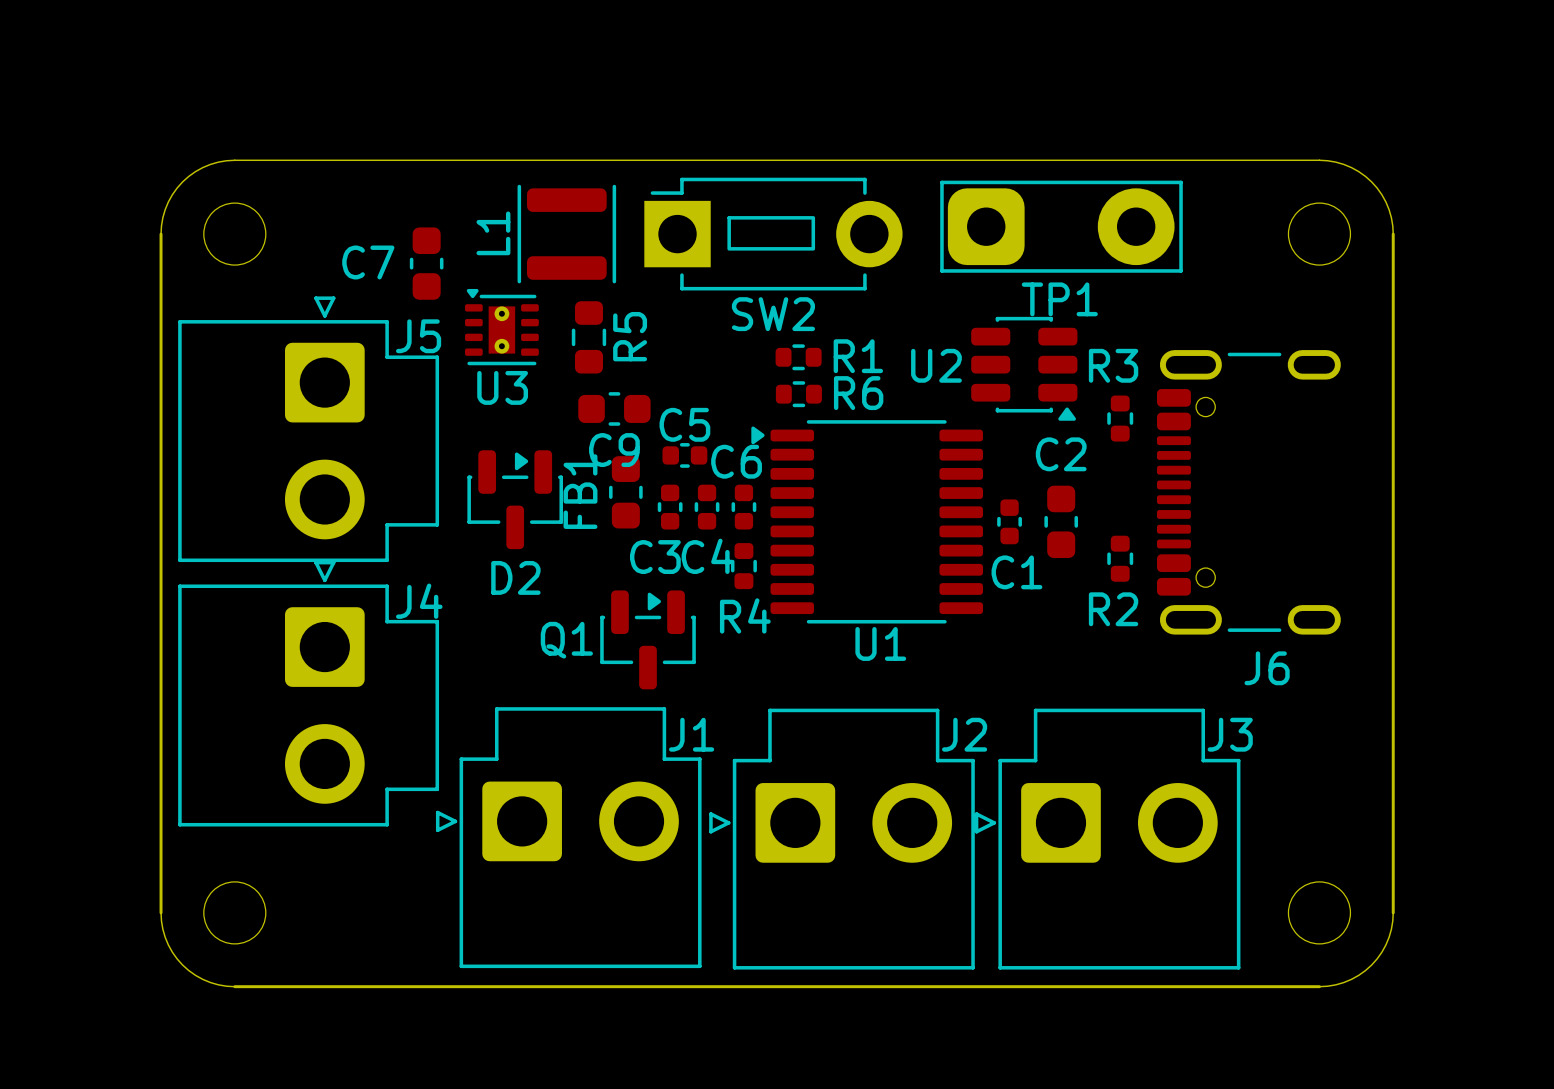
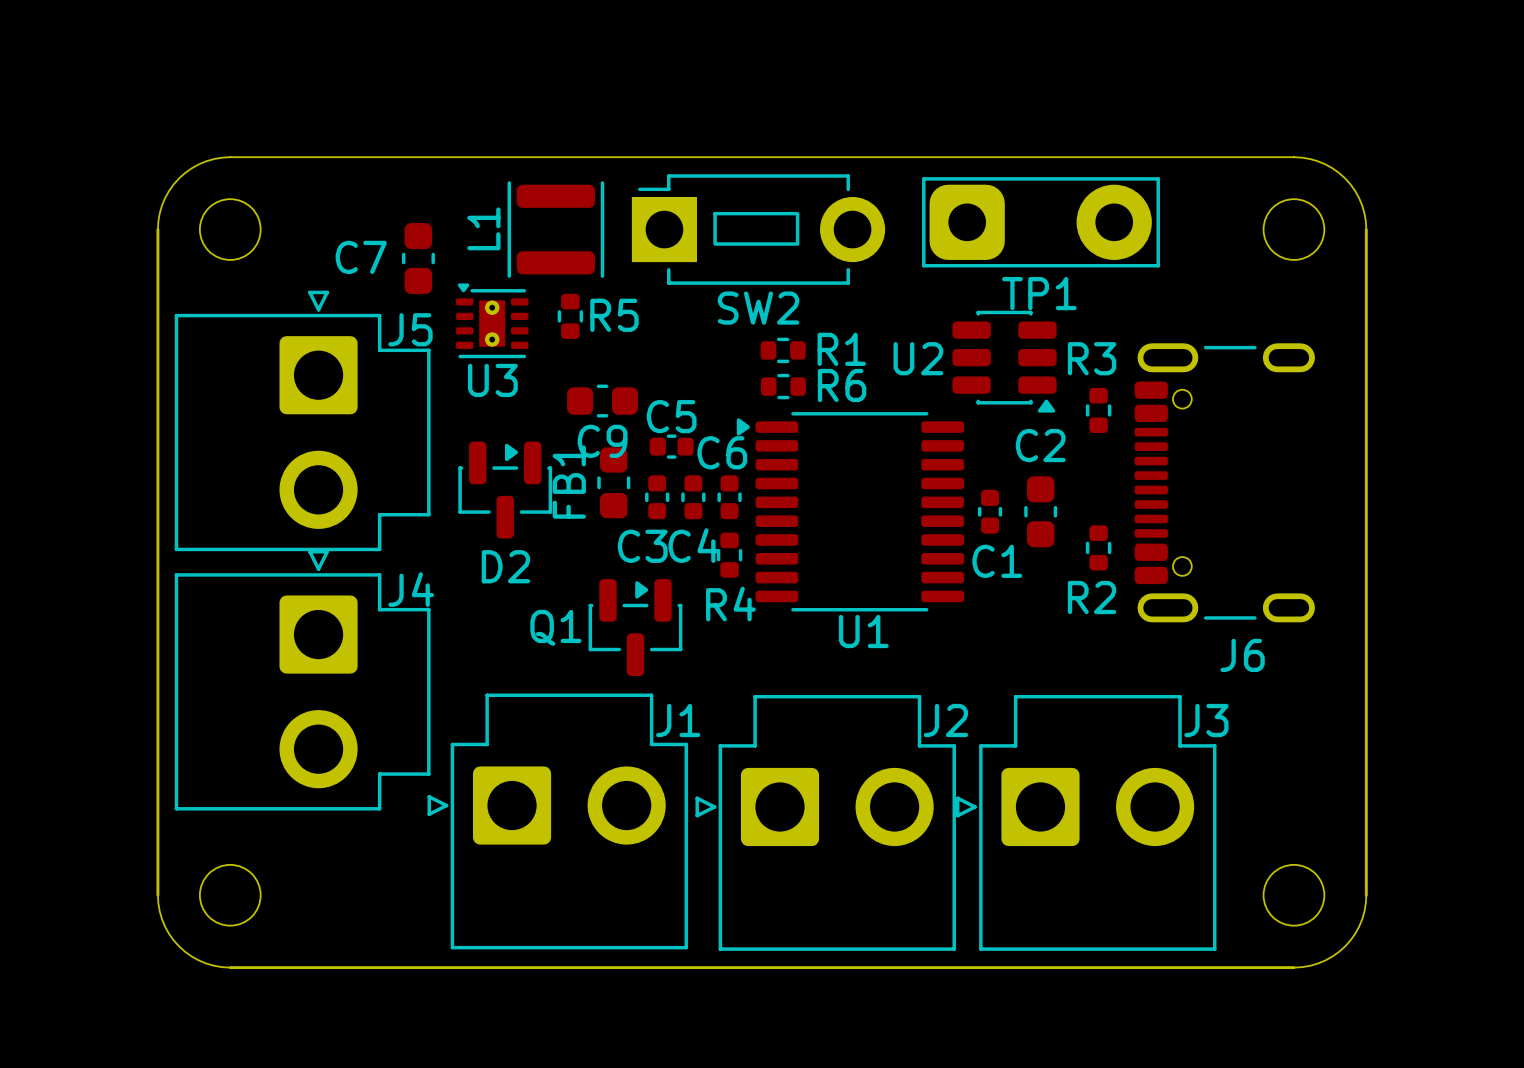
R5 footprint: [571, 301, 607, 374] -> [557, 293, 584, 339]
R5 name rotation: 0° (630, 336) -> 90° clockwise (614, 315)

